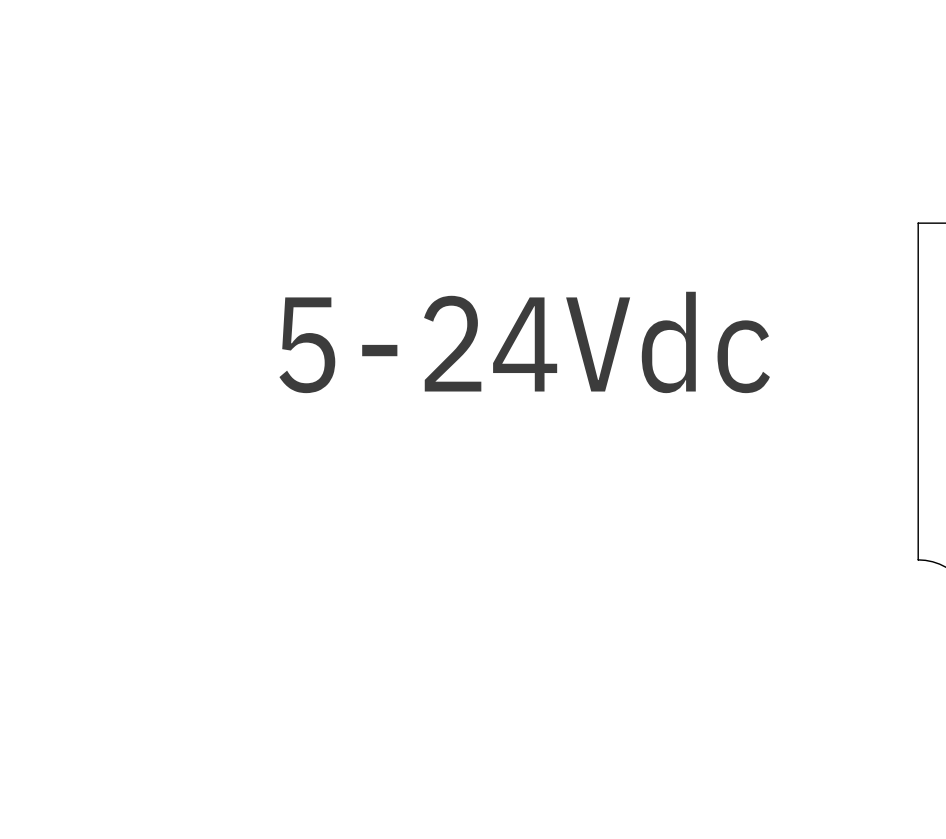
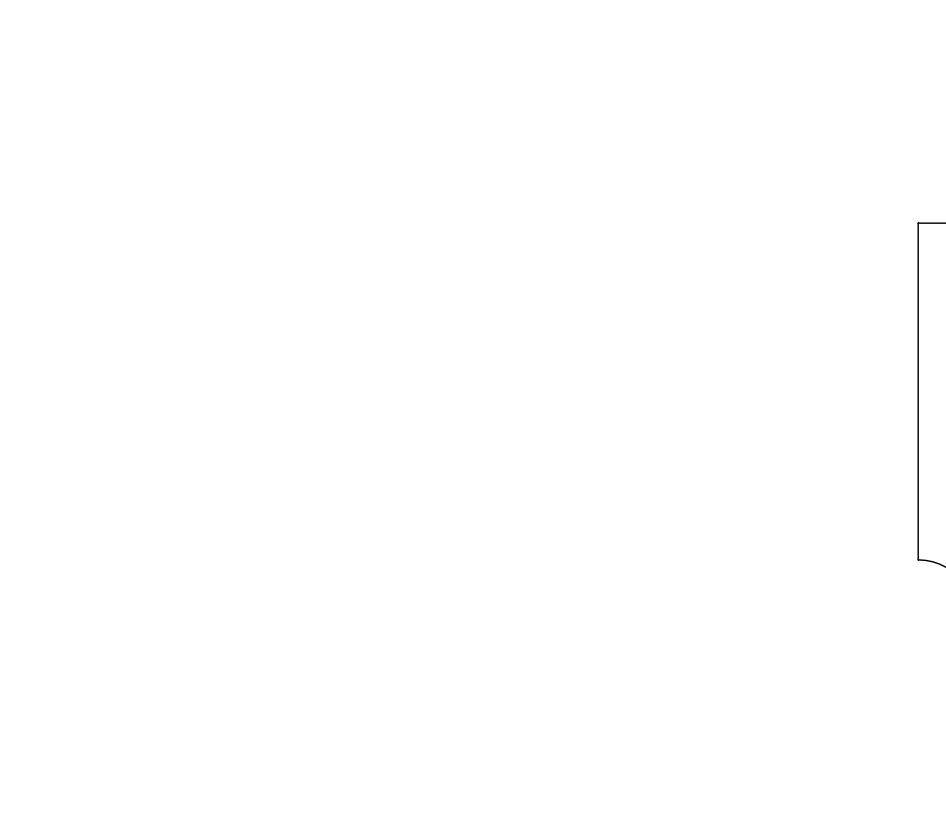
text: 5-24Vdc (524, 342) -> none

